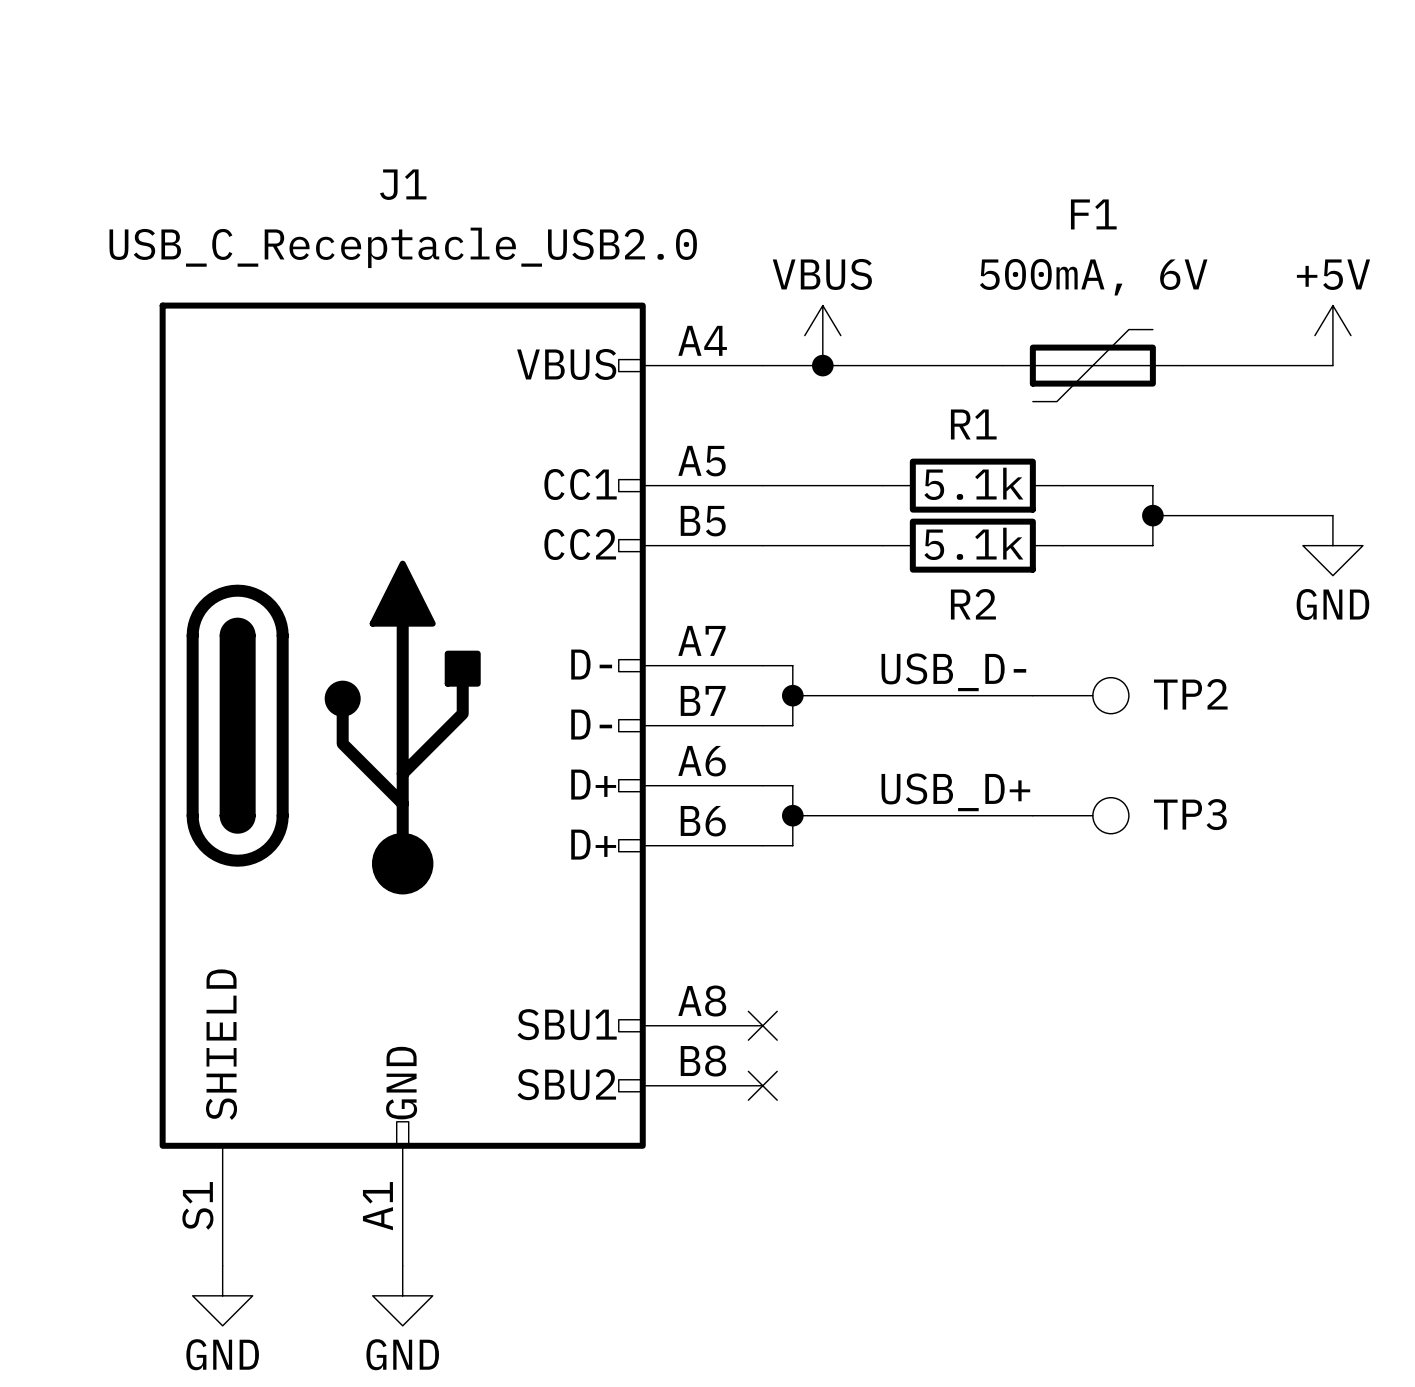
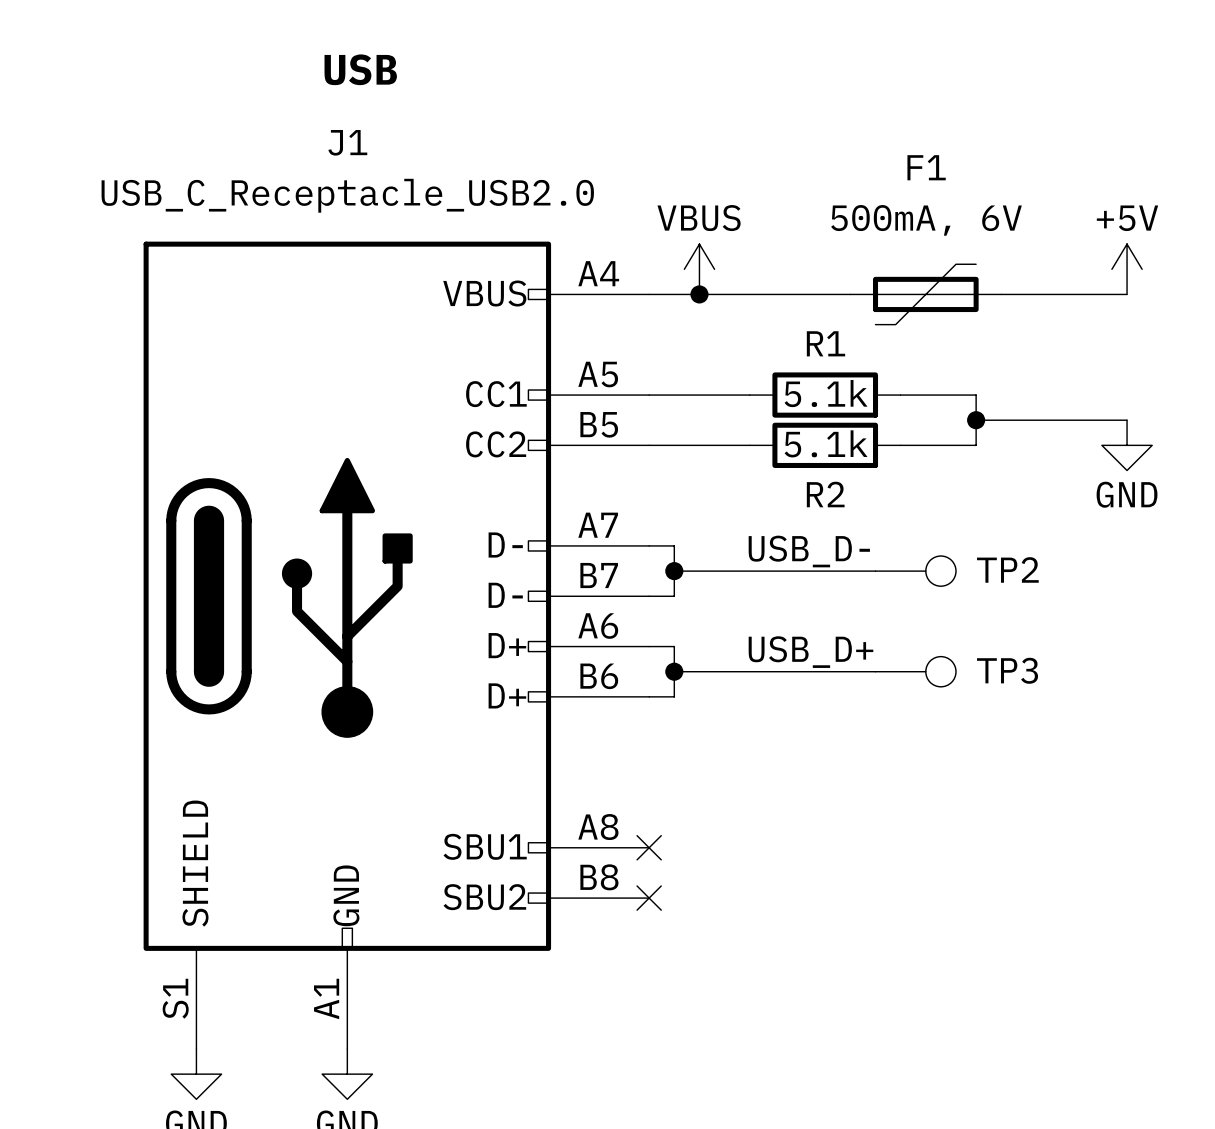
text: none -> USB (360, 69)

